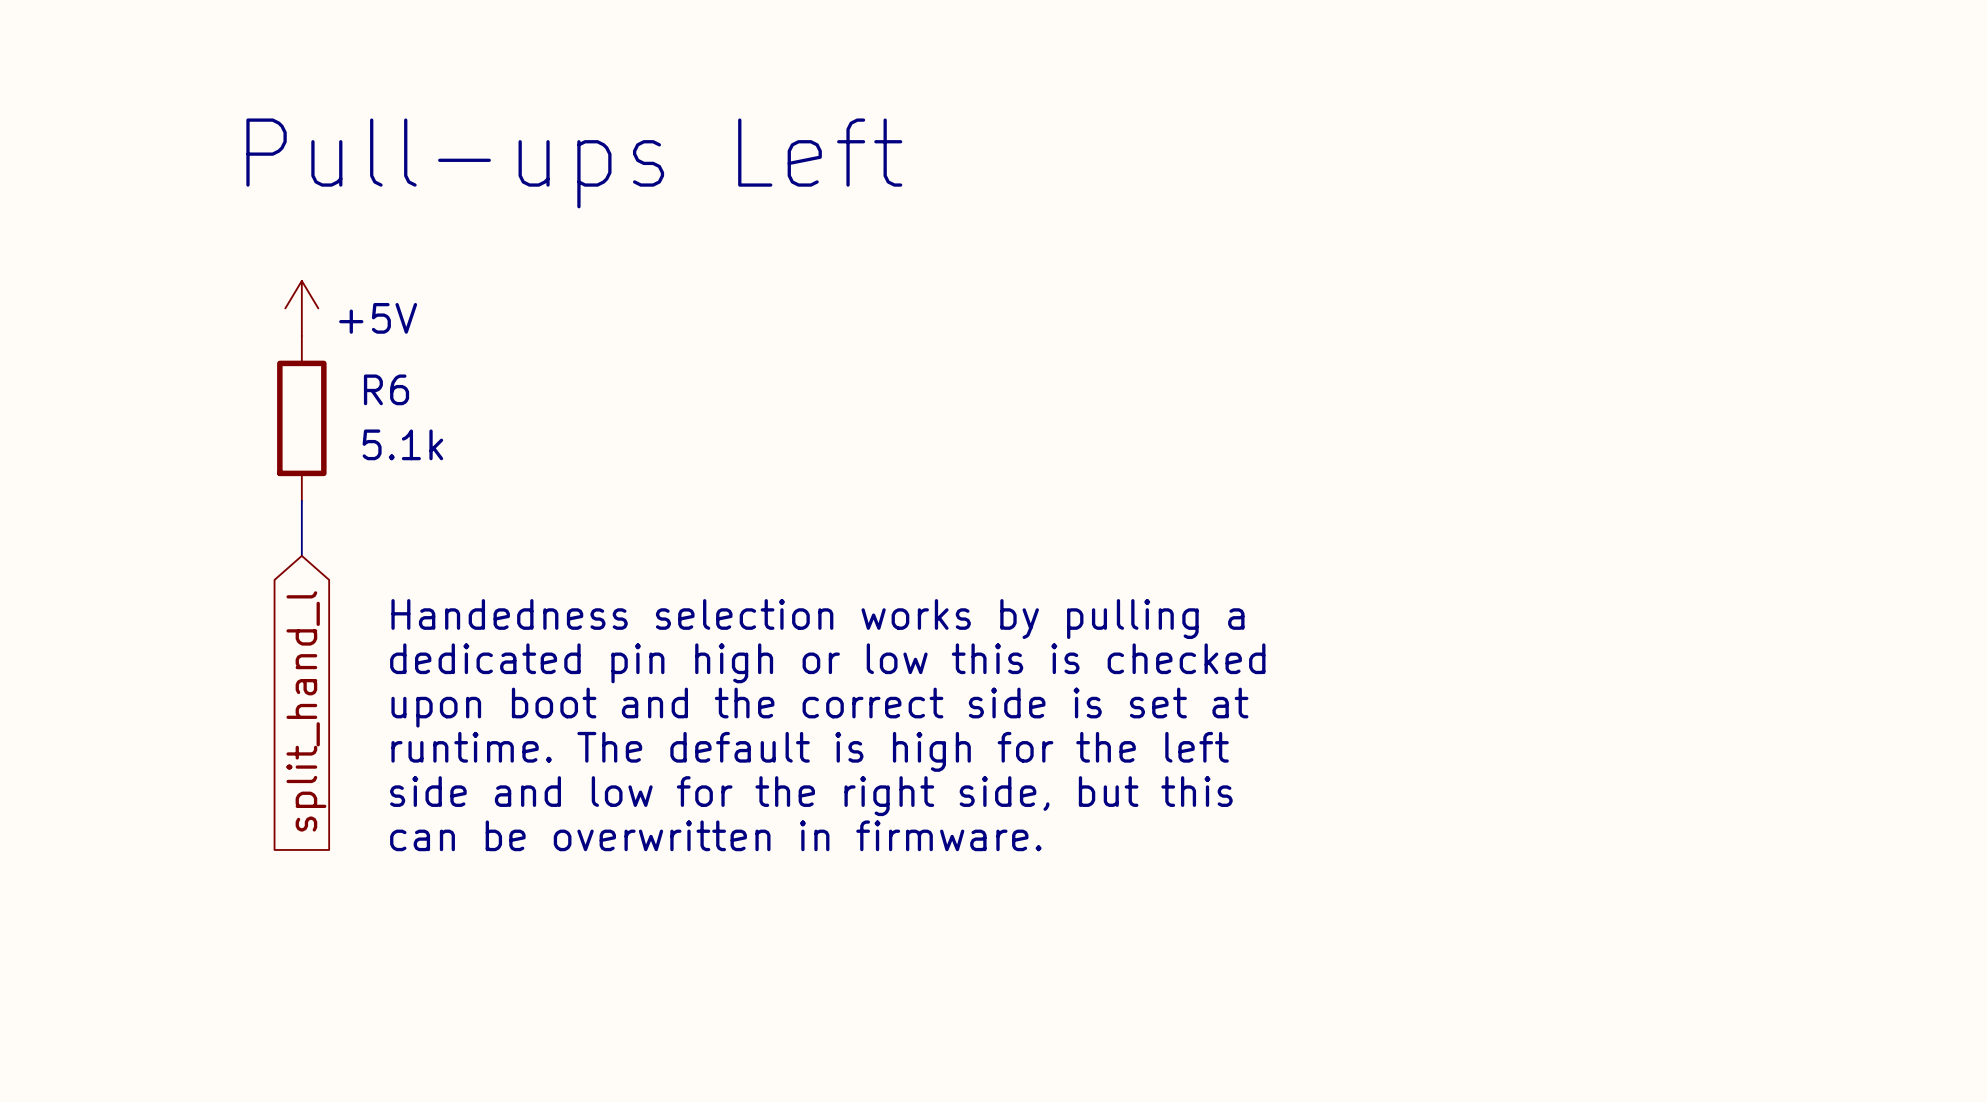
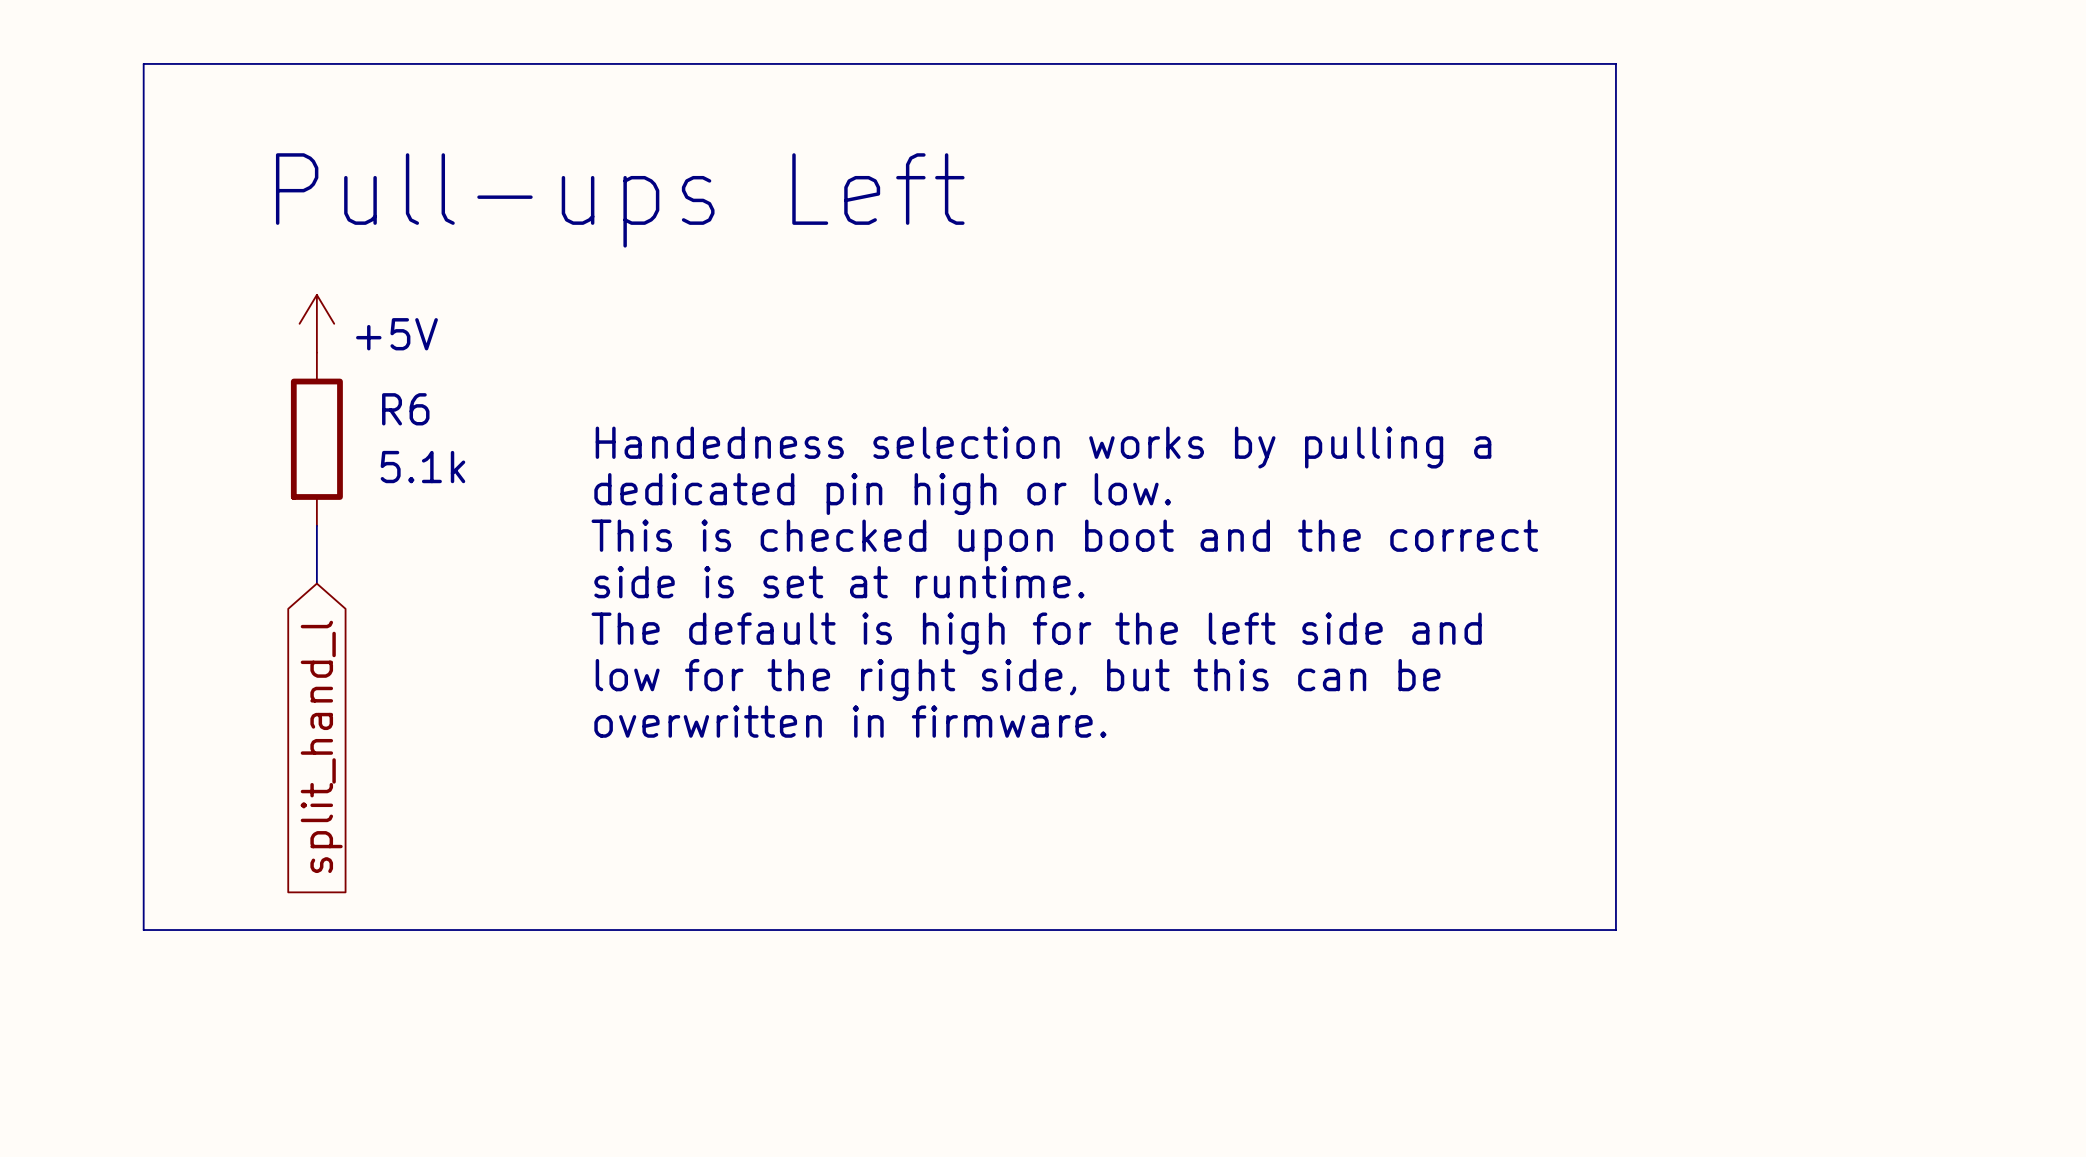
line: none -> (143, 63) (1615, 63) (1615, 930) (143, 930) (143, 63)
text position: Pull-ups Left (574, 163) -> Pull-ups Left (620, 200)
text: none -> dedicated pin high or low. (882, 494)
text: none -> This is checked upon boot and the correct (1064, 540)
text: none -> side is set at runtime. (839, 582)
text: none -> The default is high for the left side and (1036, 633)
text position: Handedness selection works by pulling a (817, 619) -> Handedness selection works by pulling a (1043, 447)
text: none -> low for the right side, but this can be (1018, 679)
text: dedicated pin high or low this is checked (827, 663) -> none
text: none -> overwritten in firmware. (850, 721)
text: upon boot and the correct side is set at (819, 707) -> none
text: runtime. The default is high for the left (810, 751) -> none
text: side and low for the right side, but this (811, 796) -> none
text: can be overwritten in firmware. (715, 835) -> none

